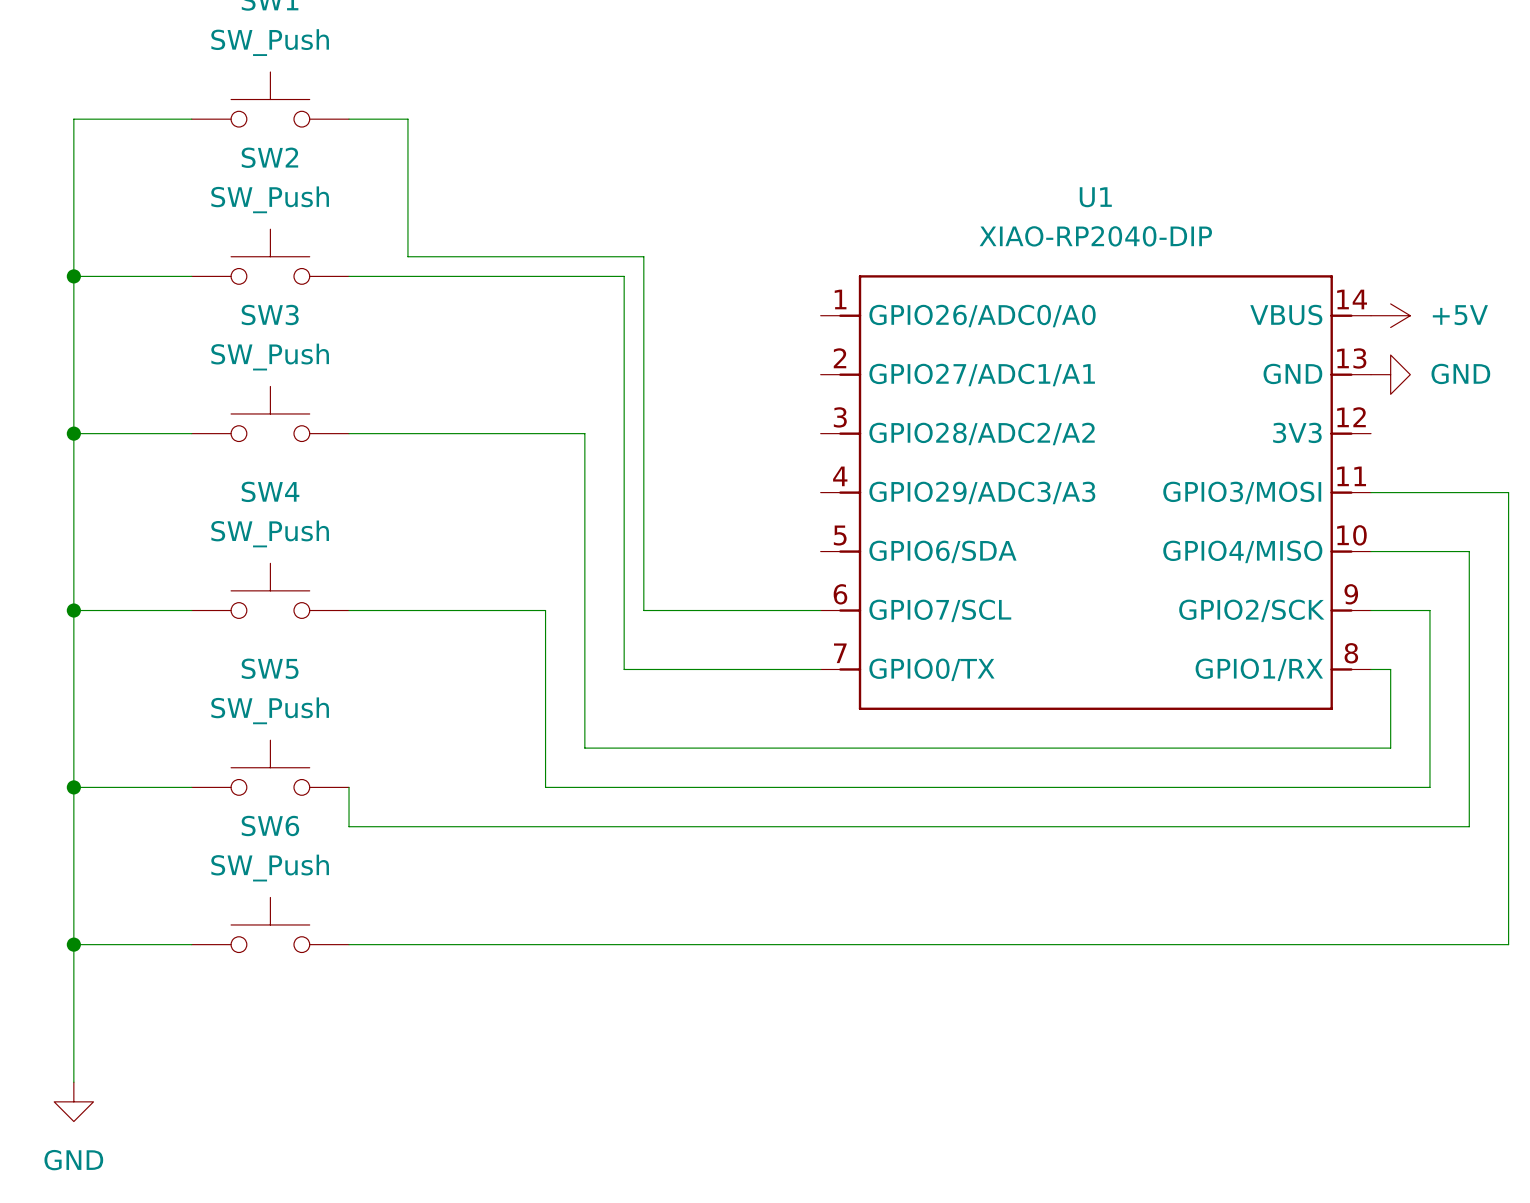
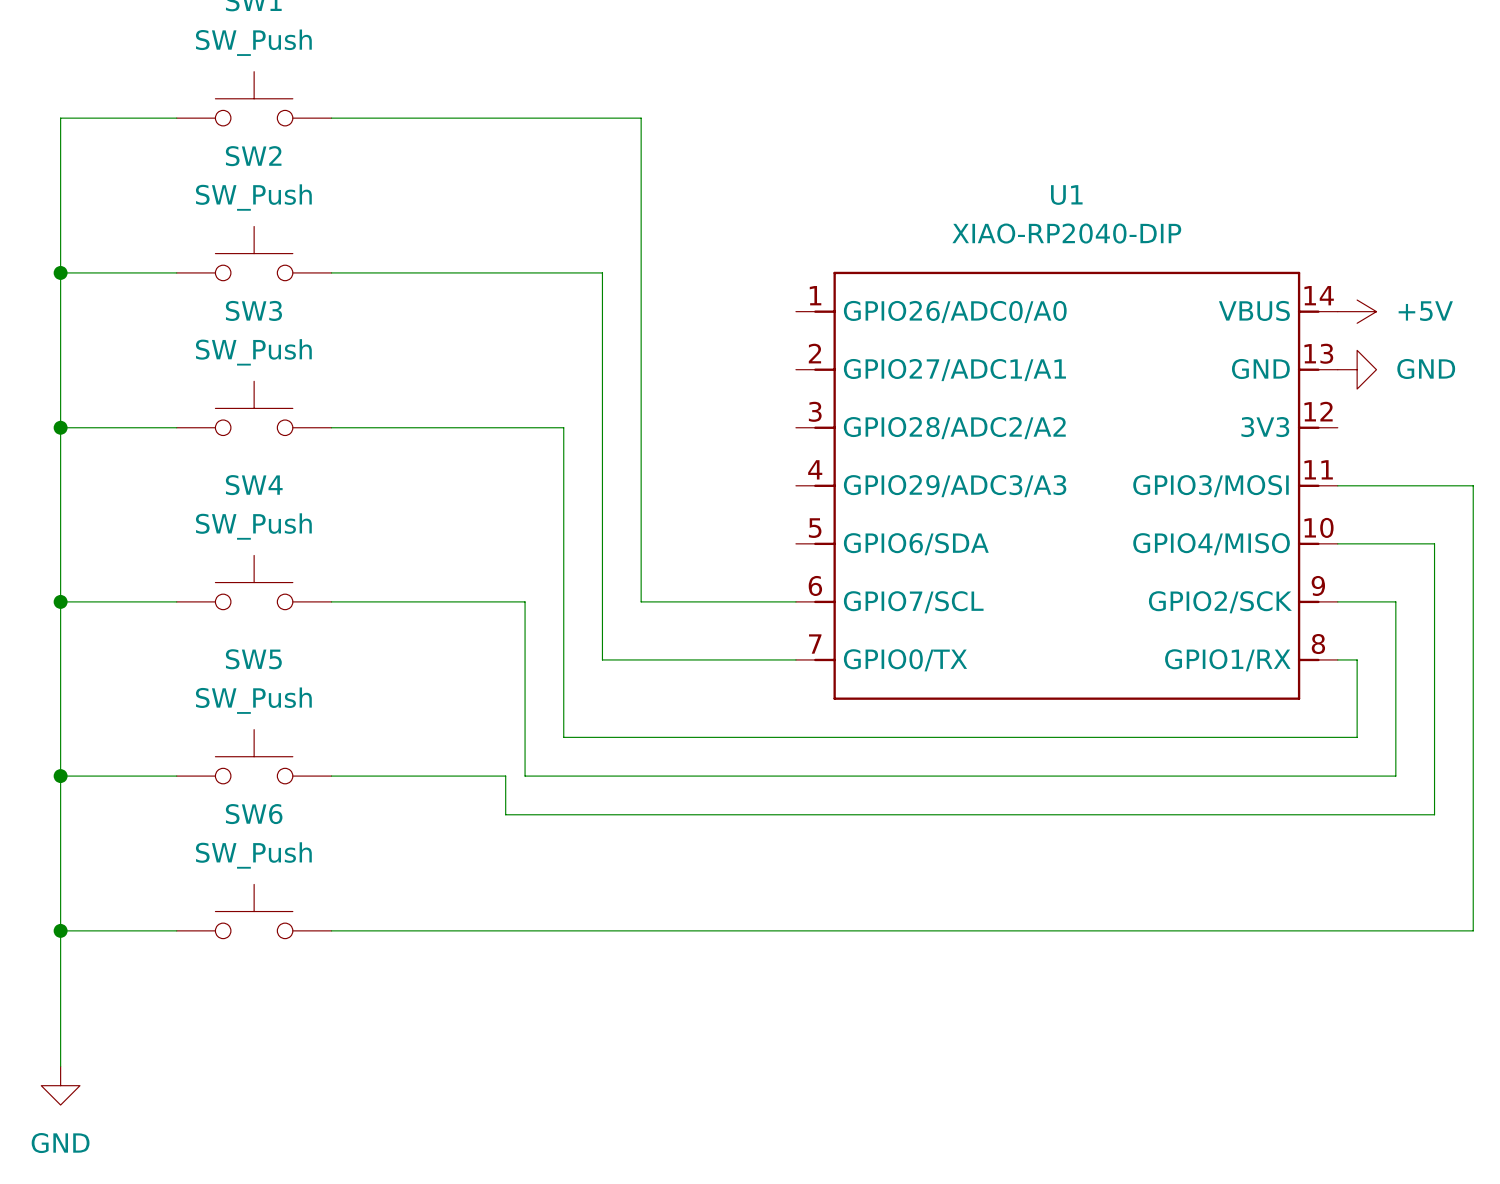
wire: (407, 119) (407, 256) (643, 256) (643, 610) (663, 610) -> (389, 118) (641, 118) (641, 601)
wire: (349, 787) (349, 826) (525, 826) -> (331, 776) (505, 776) (505, 814)

